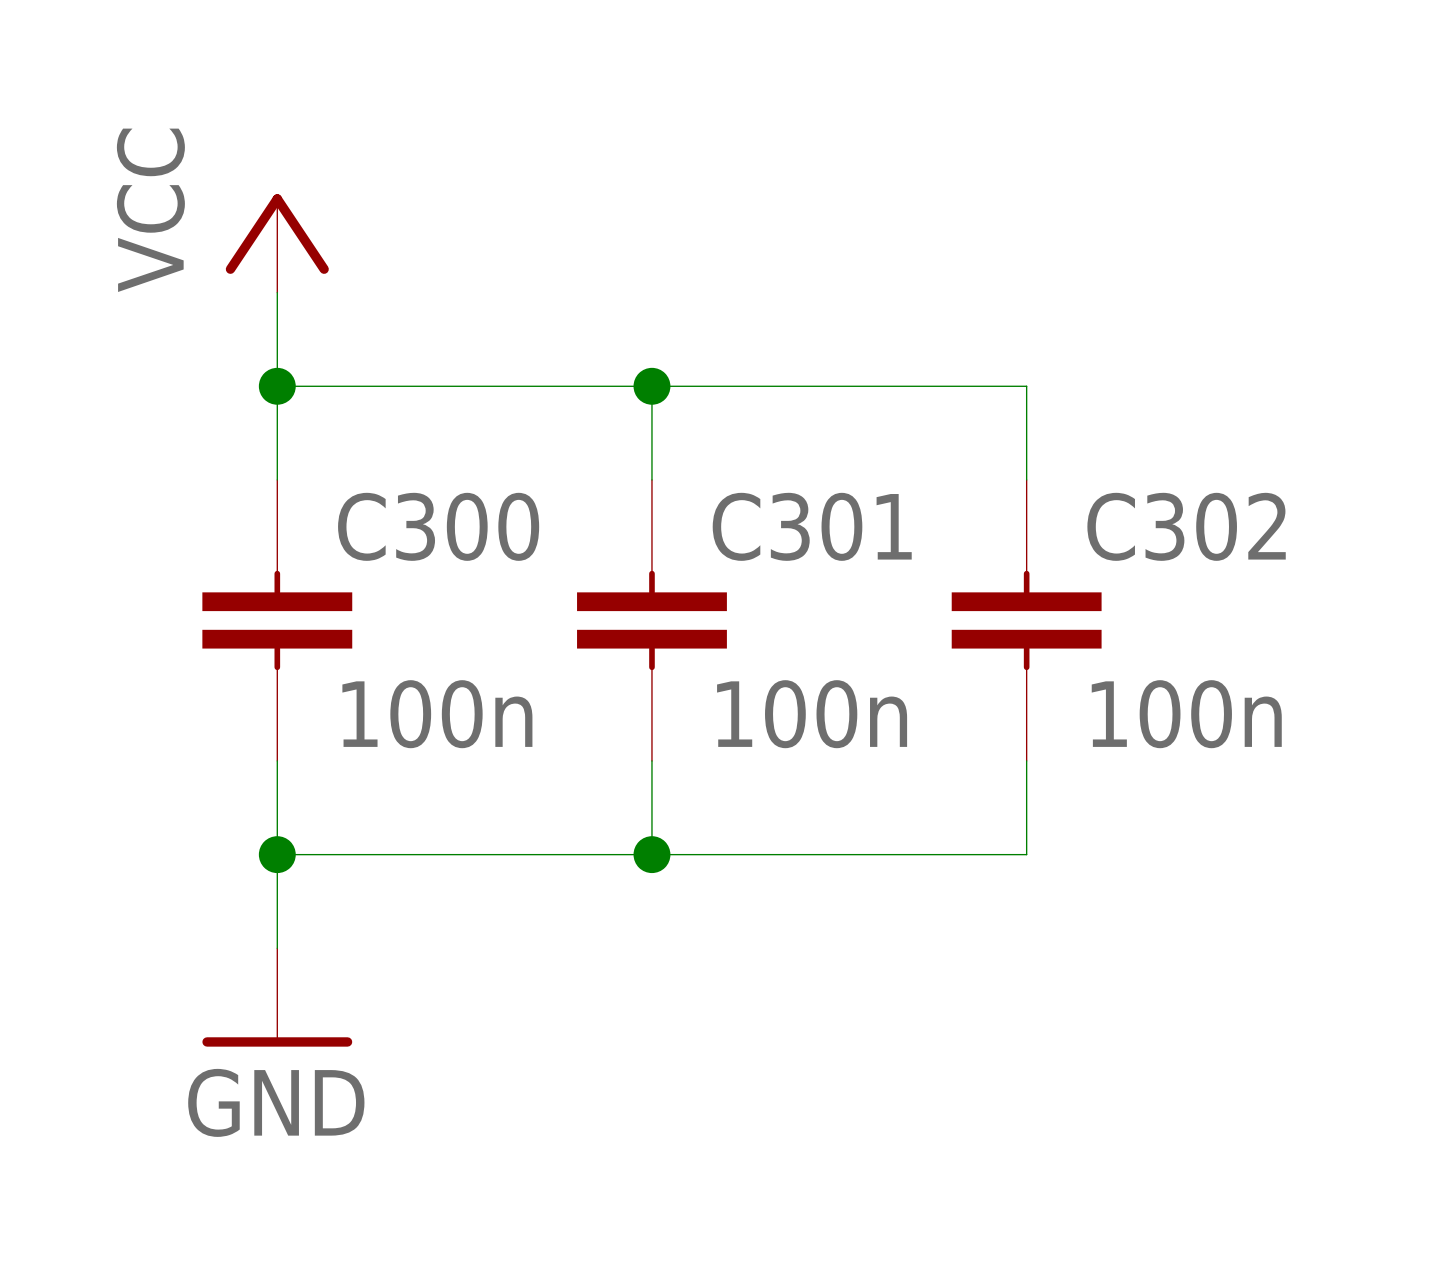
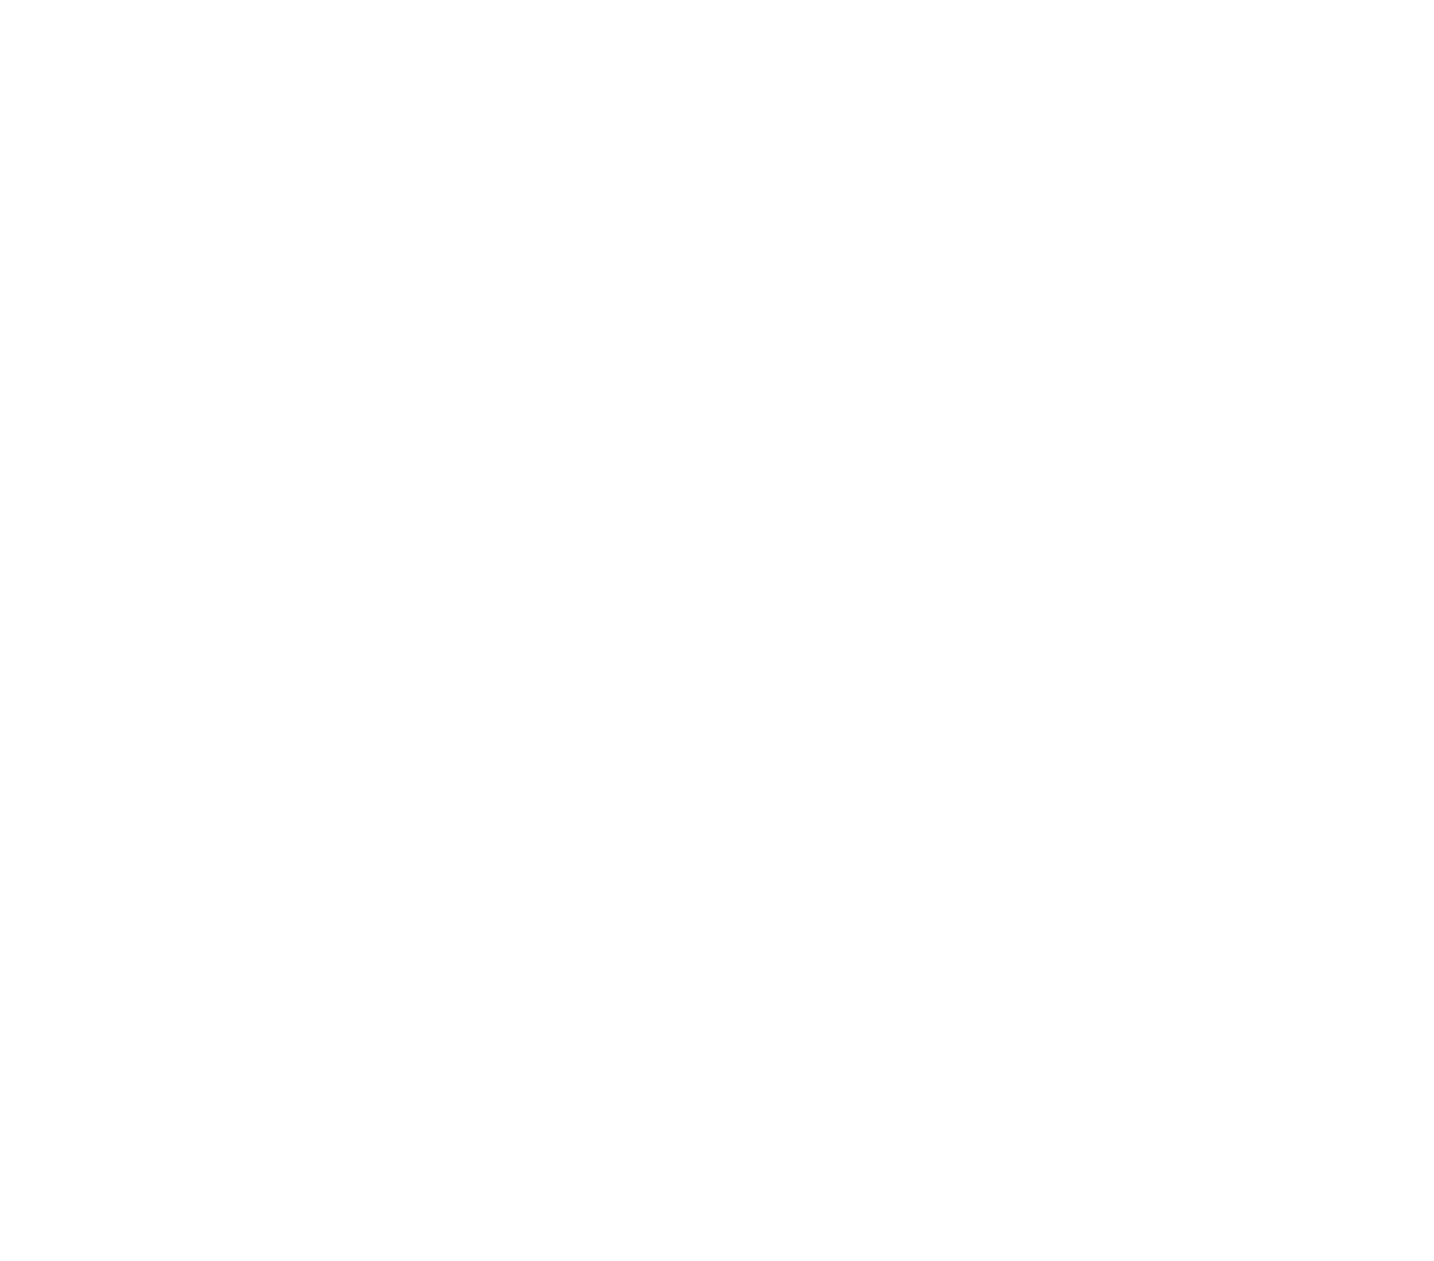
power symbol: VCC (277, 243) -> none
wire: (277, 292) (277, 479) -> none
wire: (277, 386) (1026, 386) (1026, 479) -> none
junction: (277, 386) -> none
wire: (651, 386) (651, 479) -> none
junction: (651, 386) -> none
C300: 100n (277, 620) -> none
C301: 100n (651, 620) -> none
C302: 100n (1026, 620) -> none
wire: (277, 760) (277, 948) -> none
wire: (651, 760) (651, 854) -> none
wire: (1026, 760) (1026, 854) (277, 854) -> none
junction: (277, 854) -> none
junction: (651, 854) -> none
power symbol: GND (277, 997) -> none

